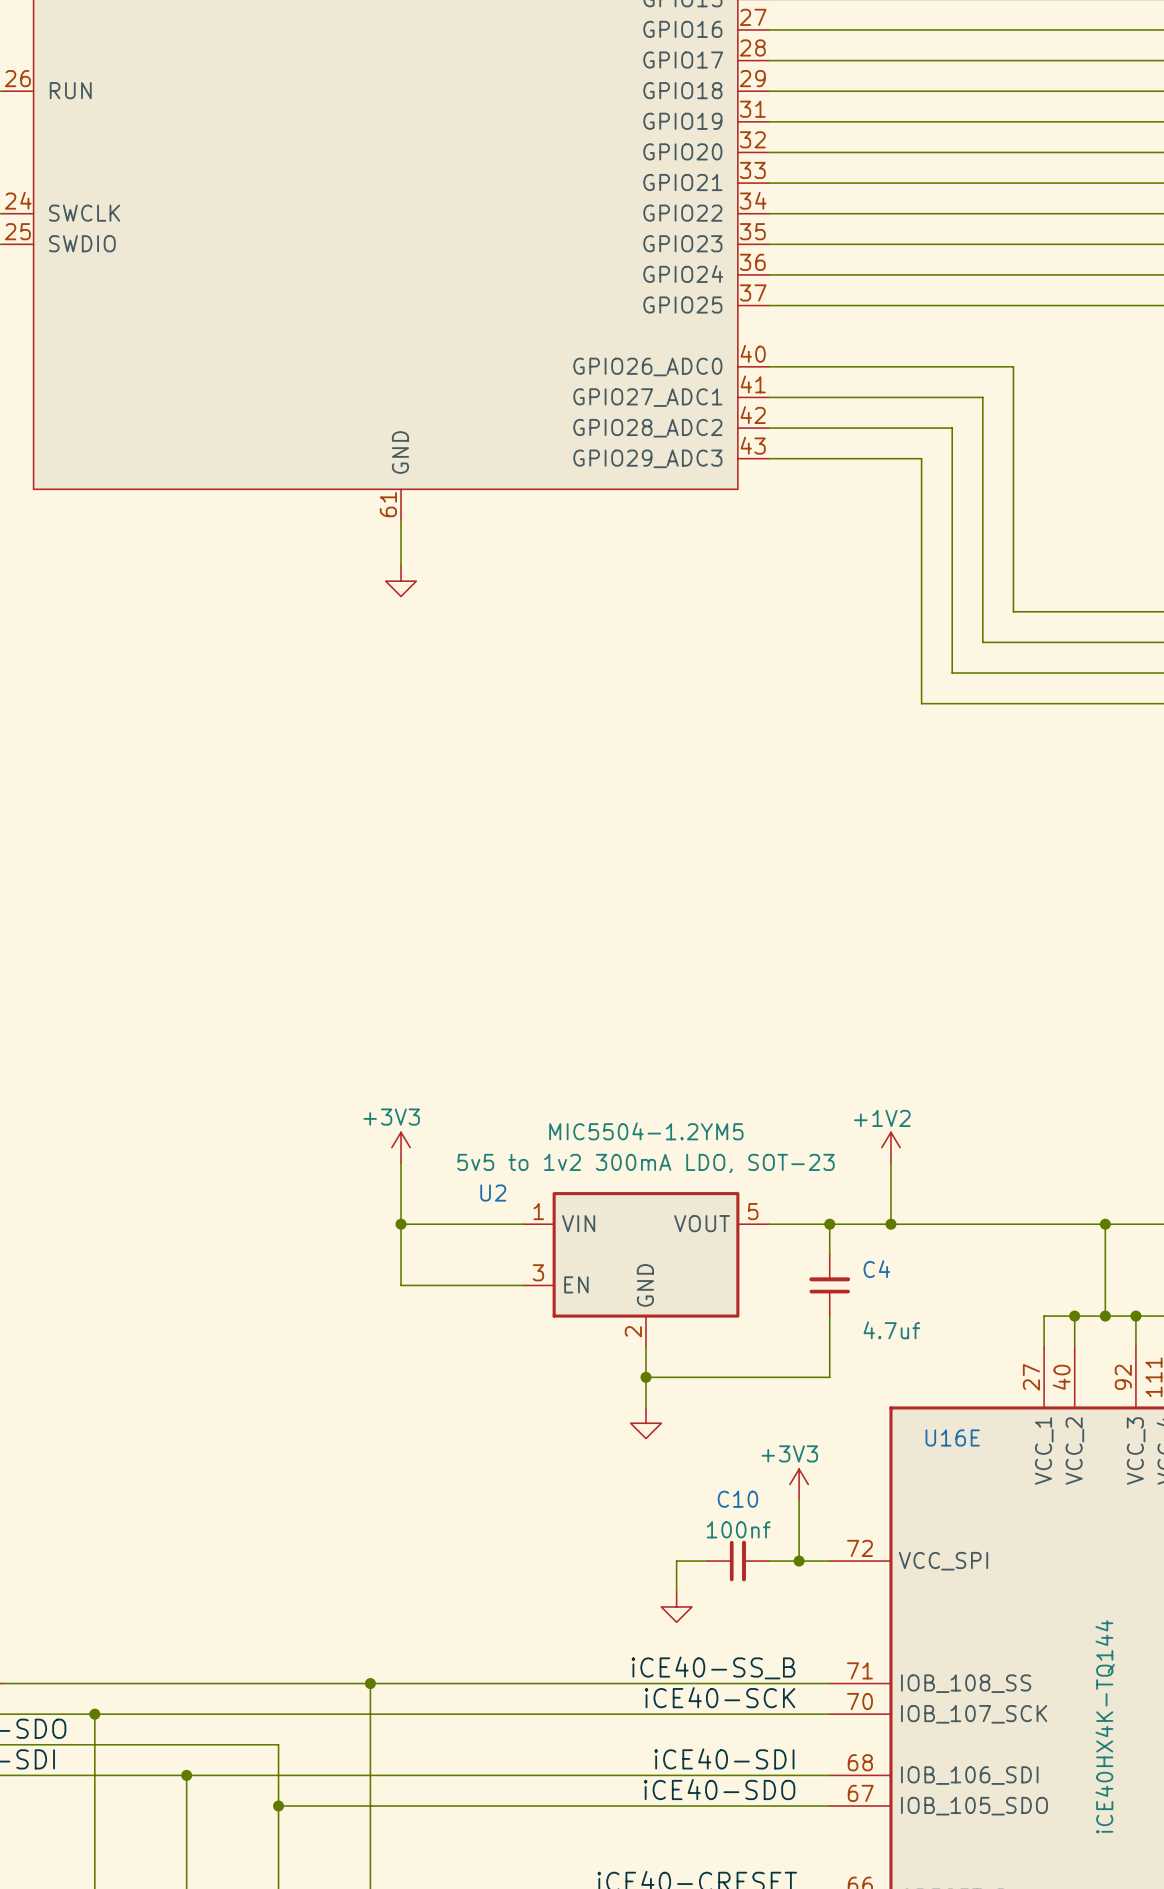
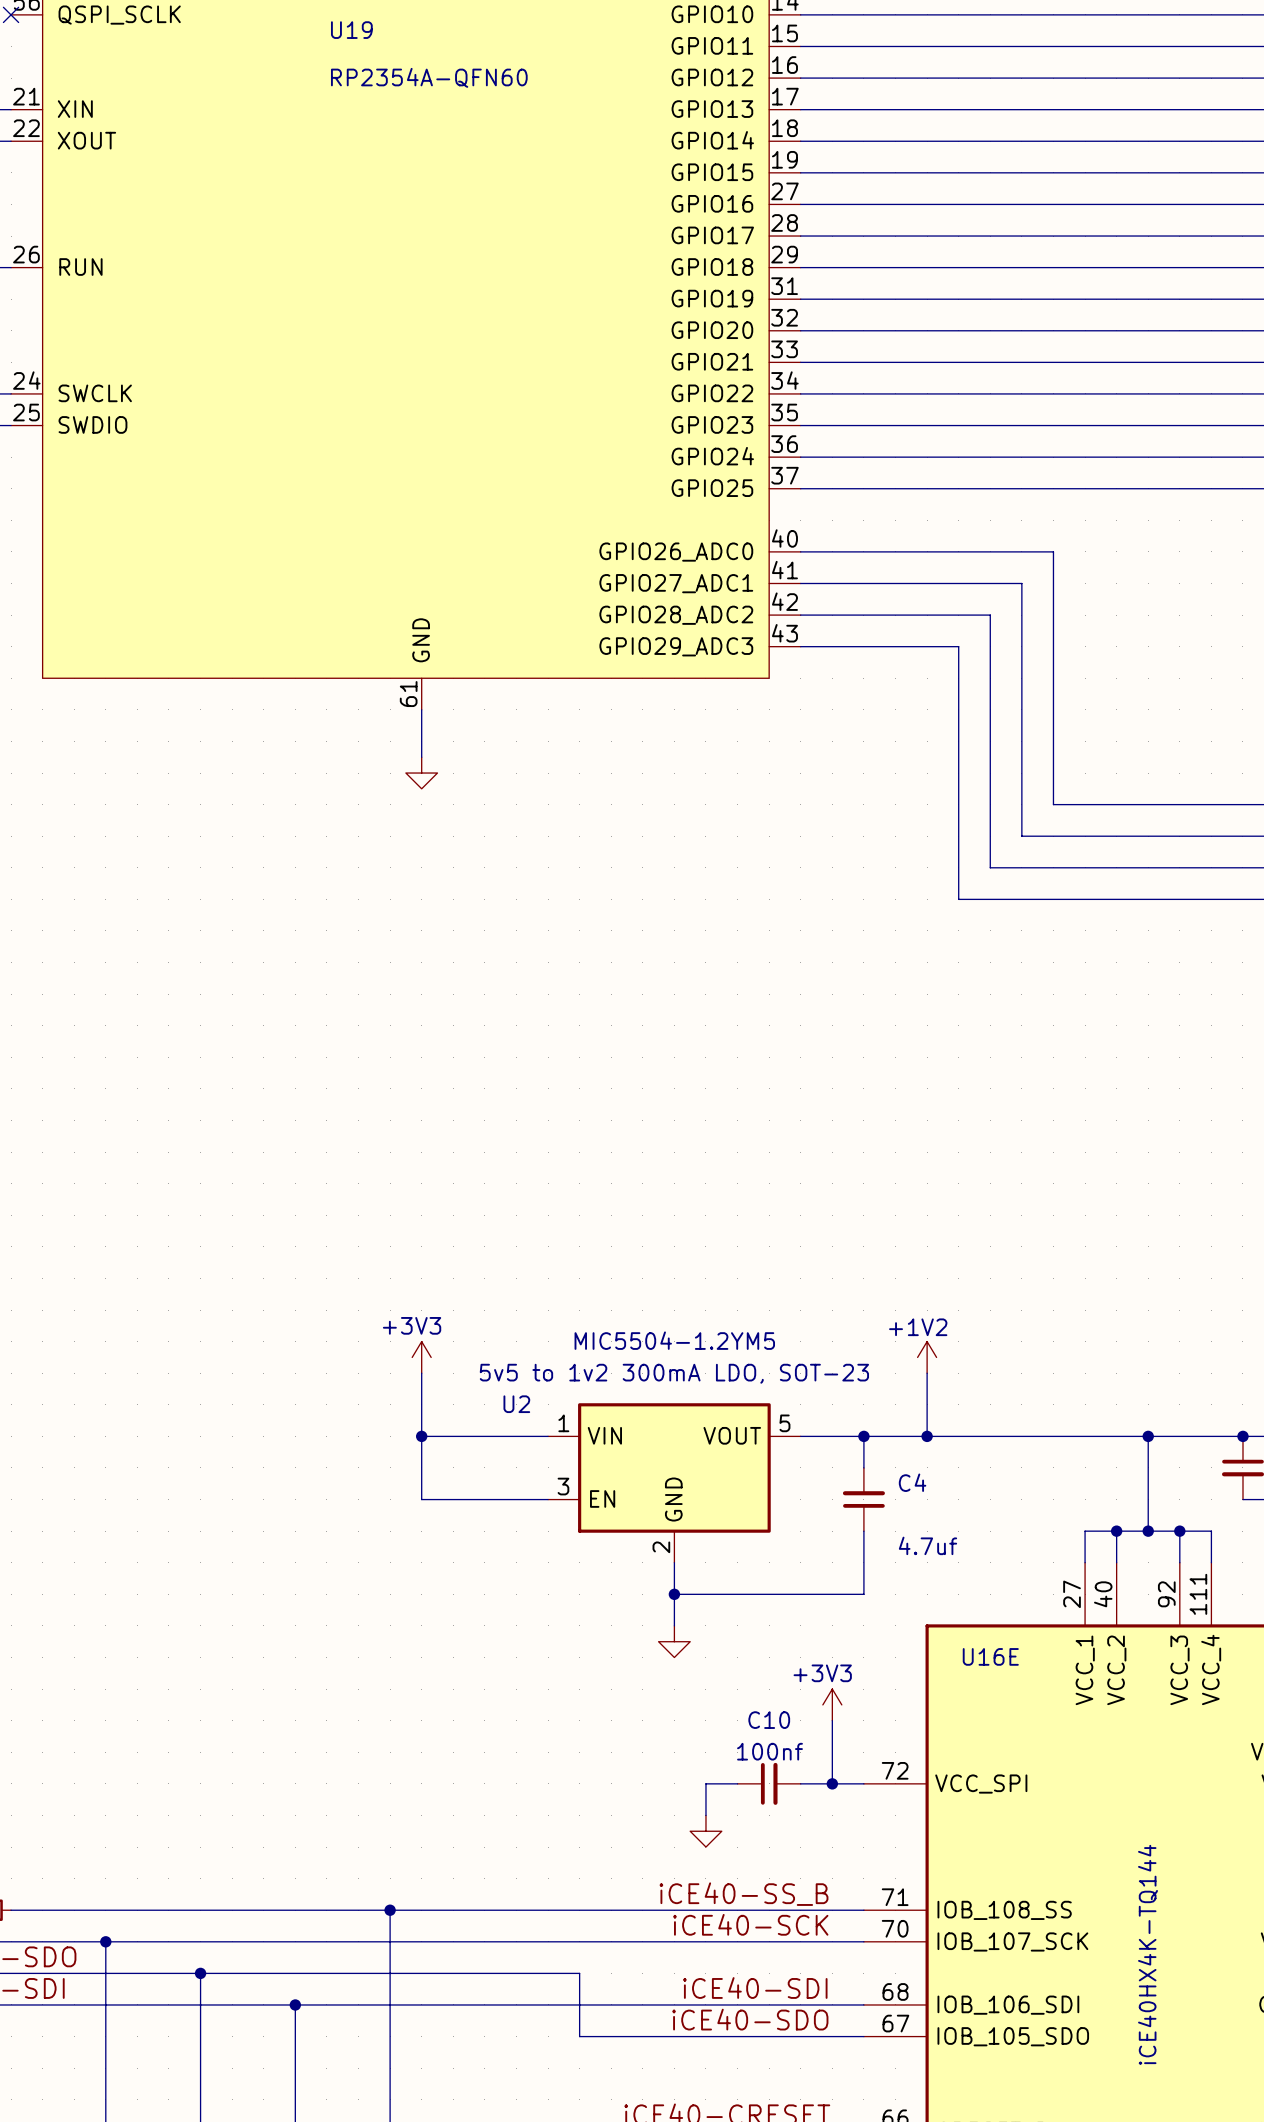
wire: (278, 1744) (278, 1775) -> (200, 1973) (200, 2004)
junction position: (186, 1775) -> (200, 1973)
wire: (278, 1806) (554, 1806) -> (295, 1973) (579, 1973) (579, 2036)
junction position: (278, 1806) -> (295, 2004)

